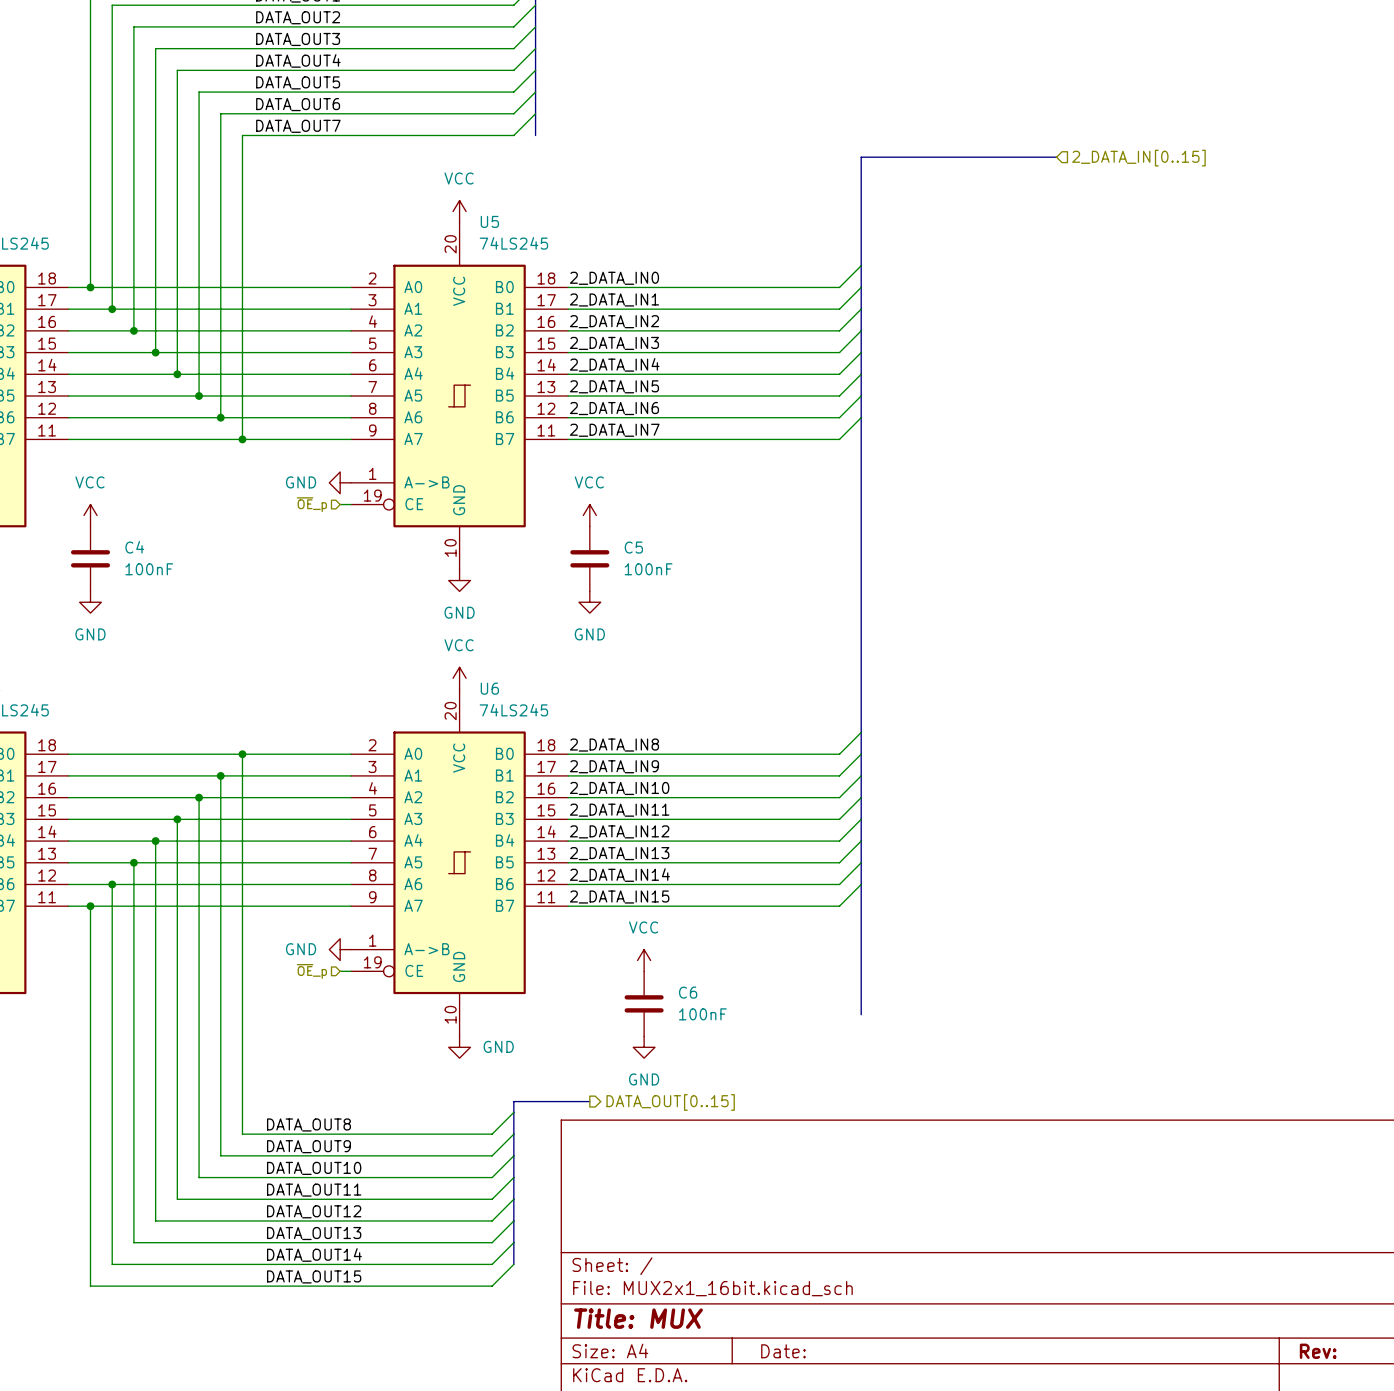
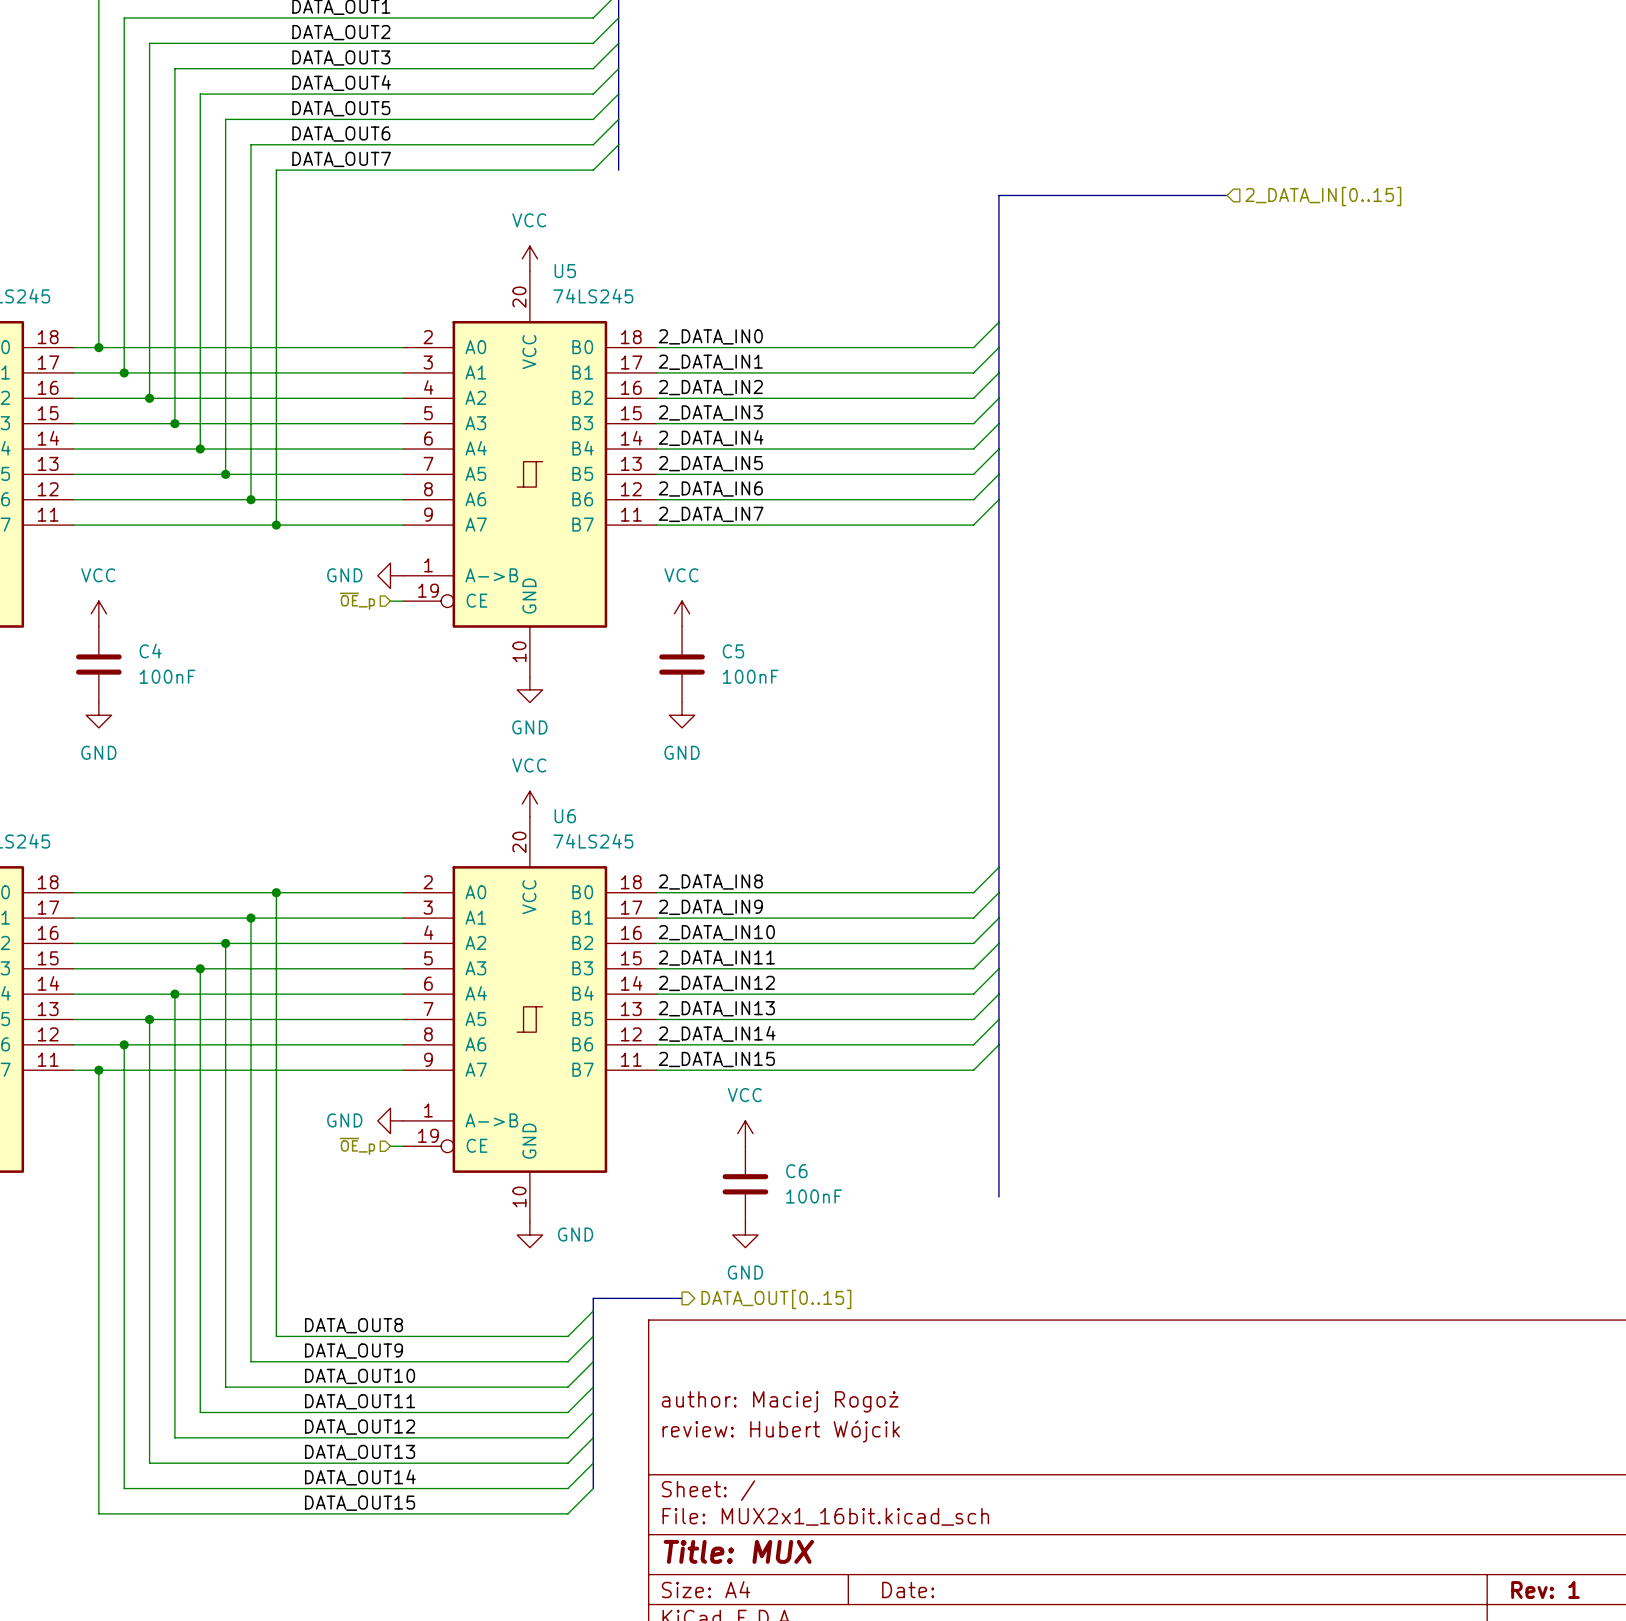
title block: none -> author: Maciej Rogoż (780, 1401)
title block: none -> review: Hubert Wójcik (781, 1431)
title block: Rev: (1318, 1351) -> Rev: 1 (1545, 1590)

